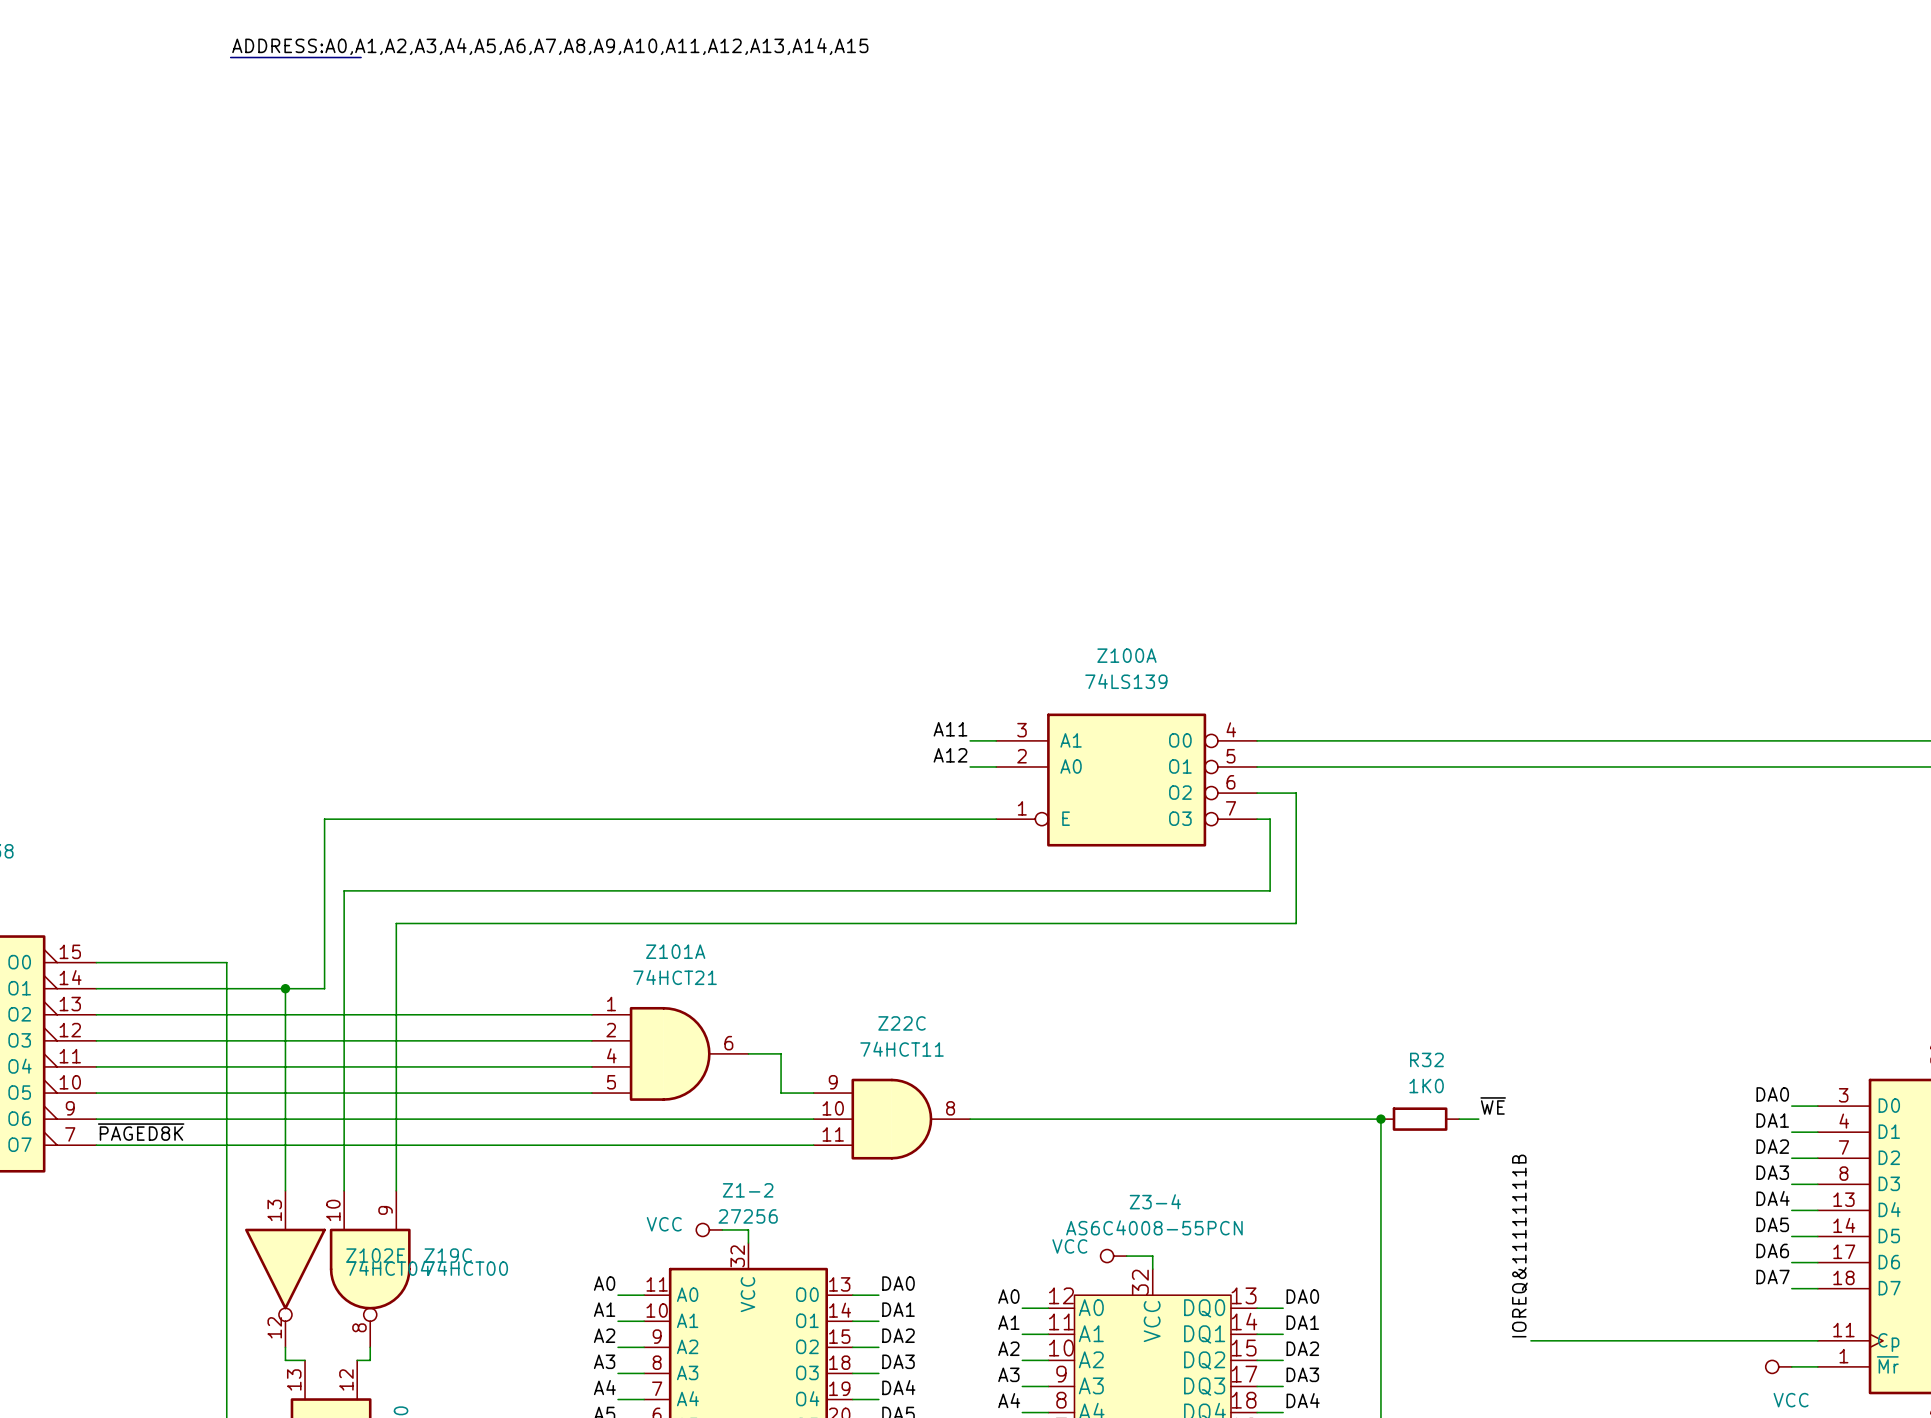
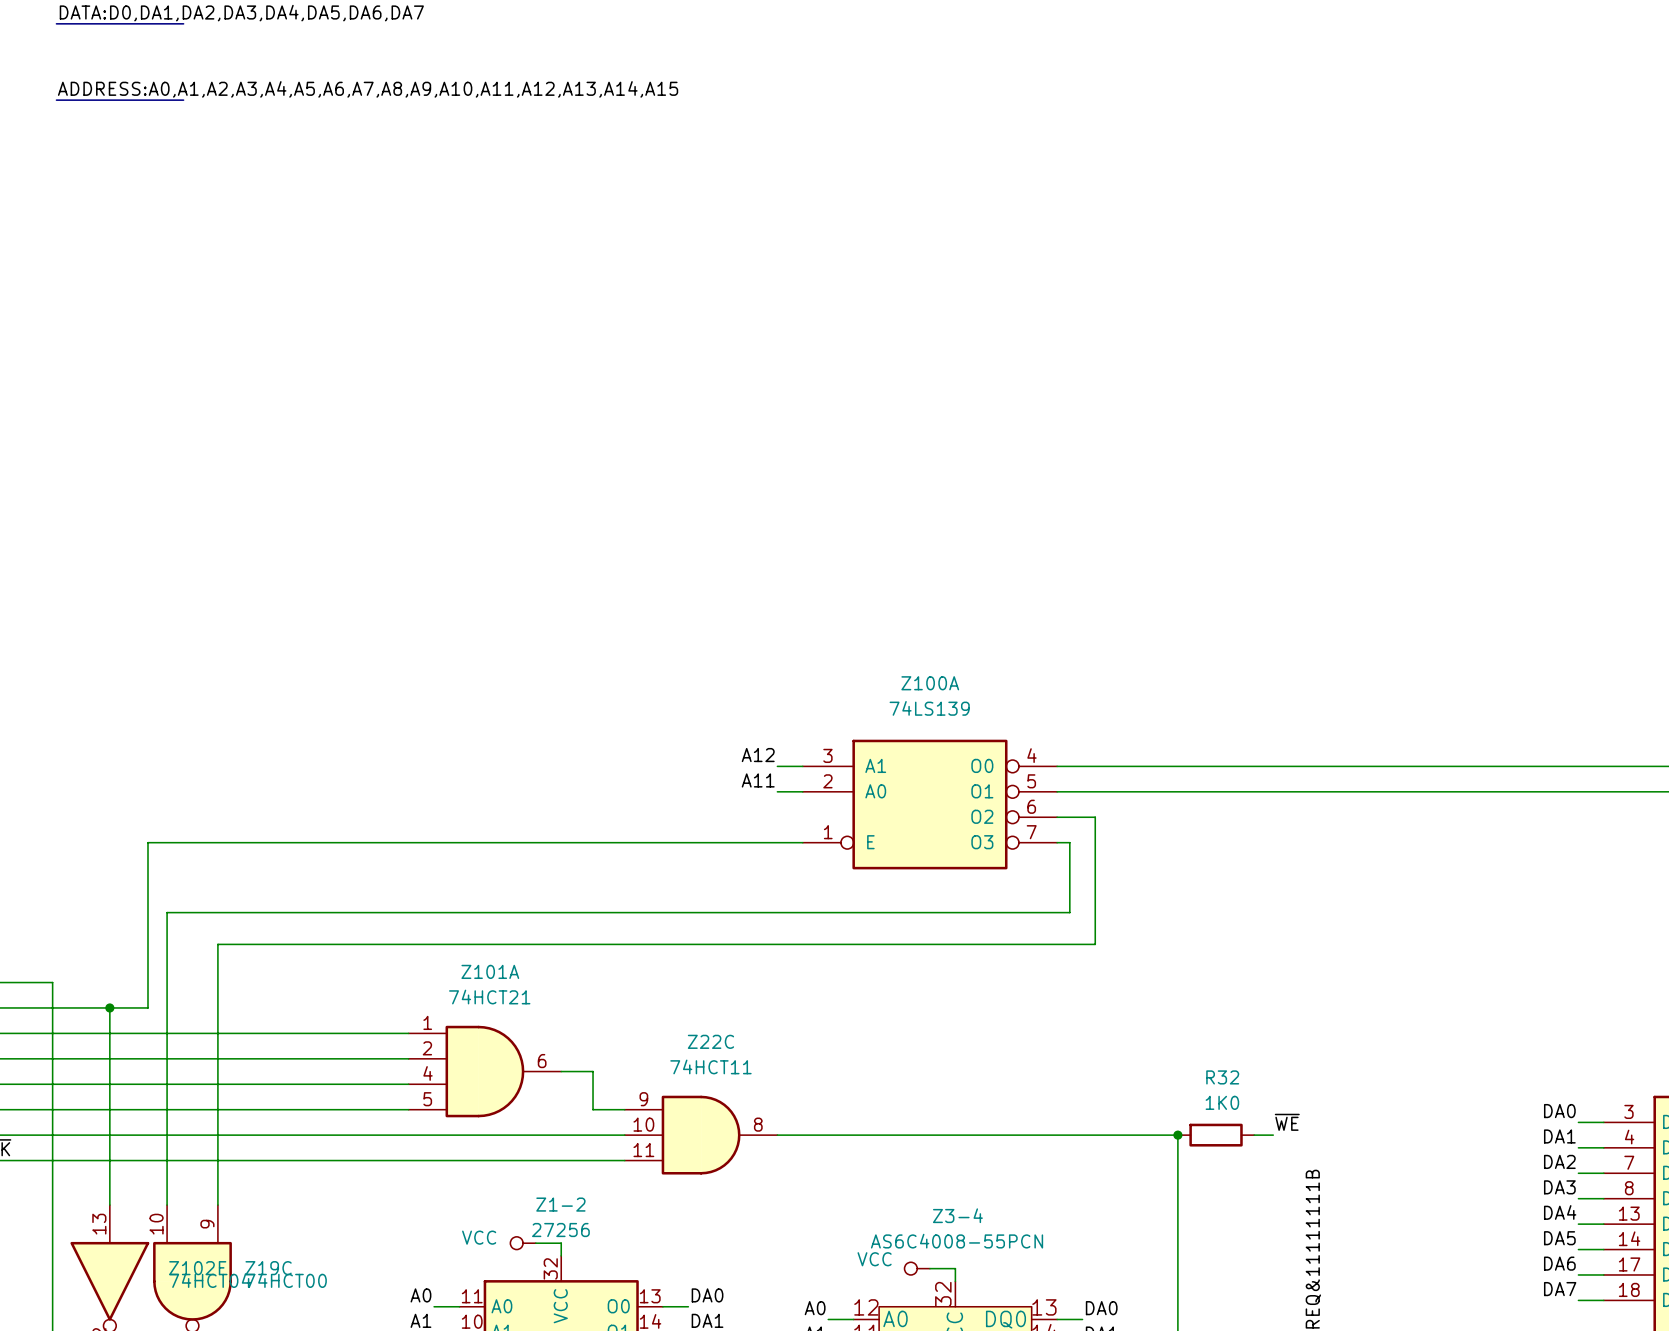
label: A11 (950, 729) -> A12 (758, 755)
label: A12 (950, 755) -> A11 (758, 780)

